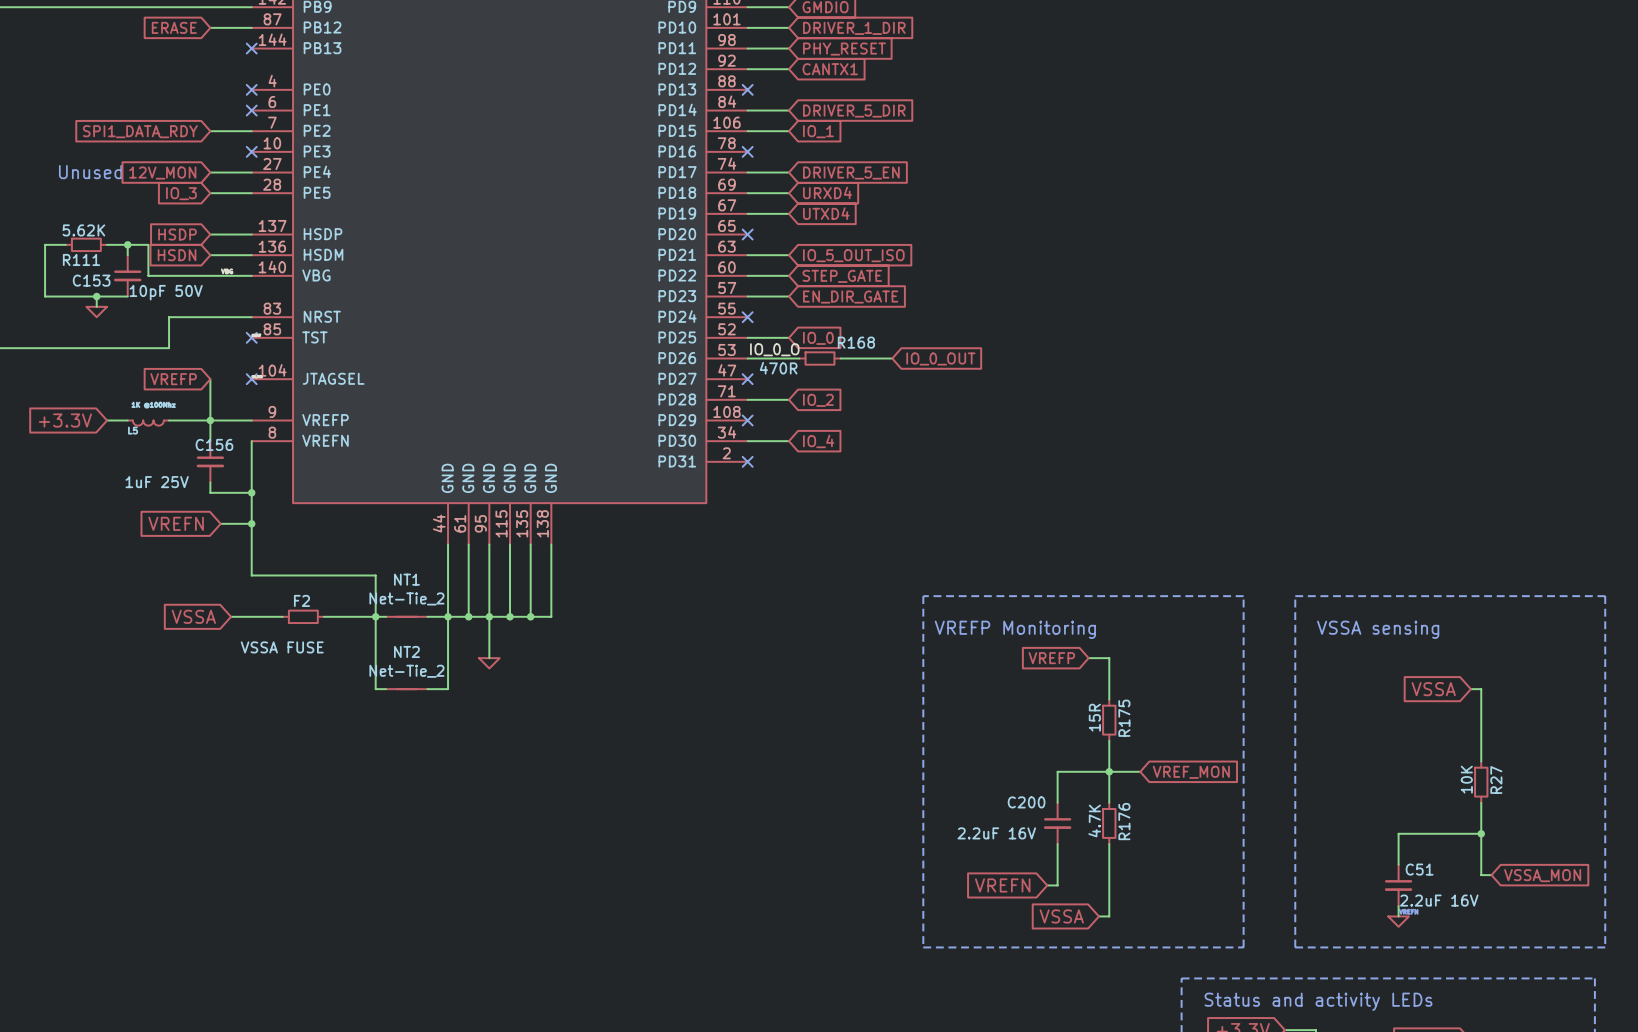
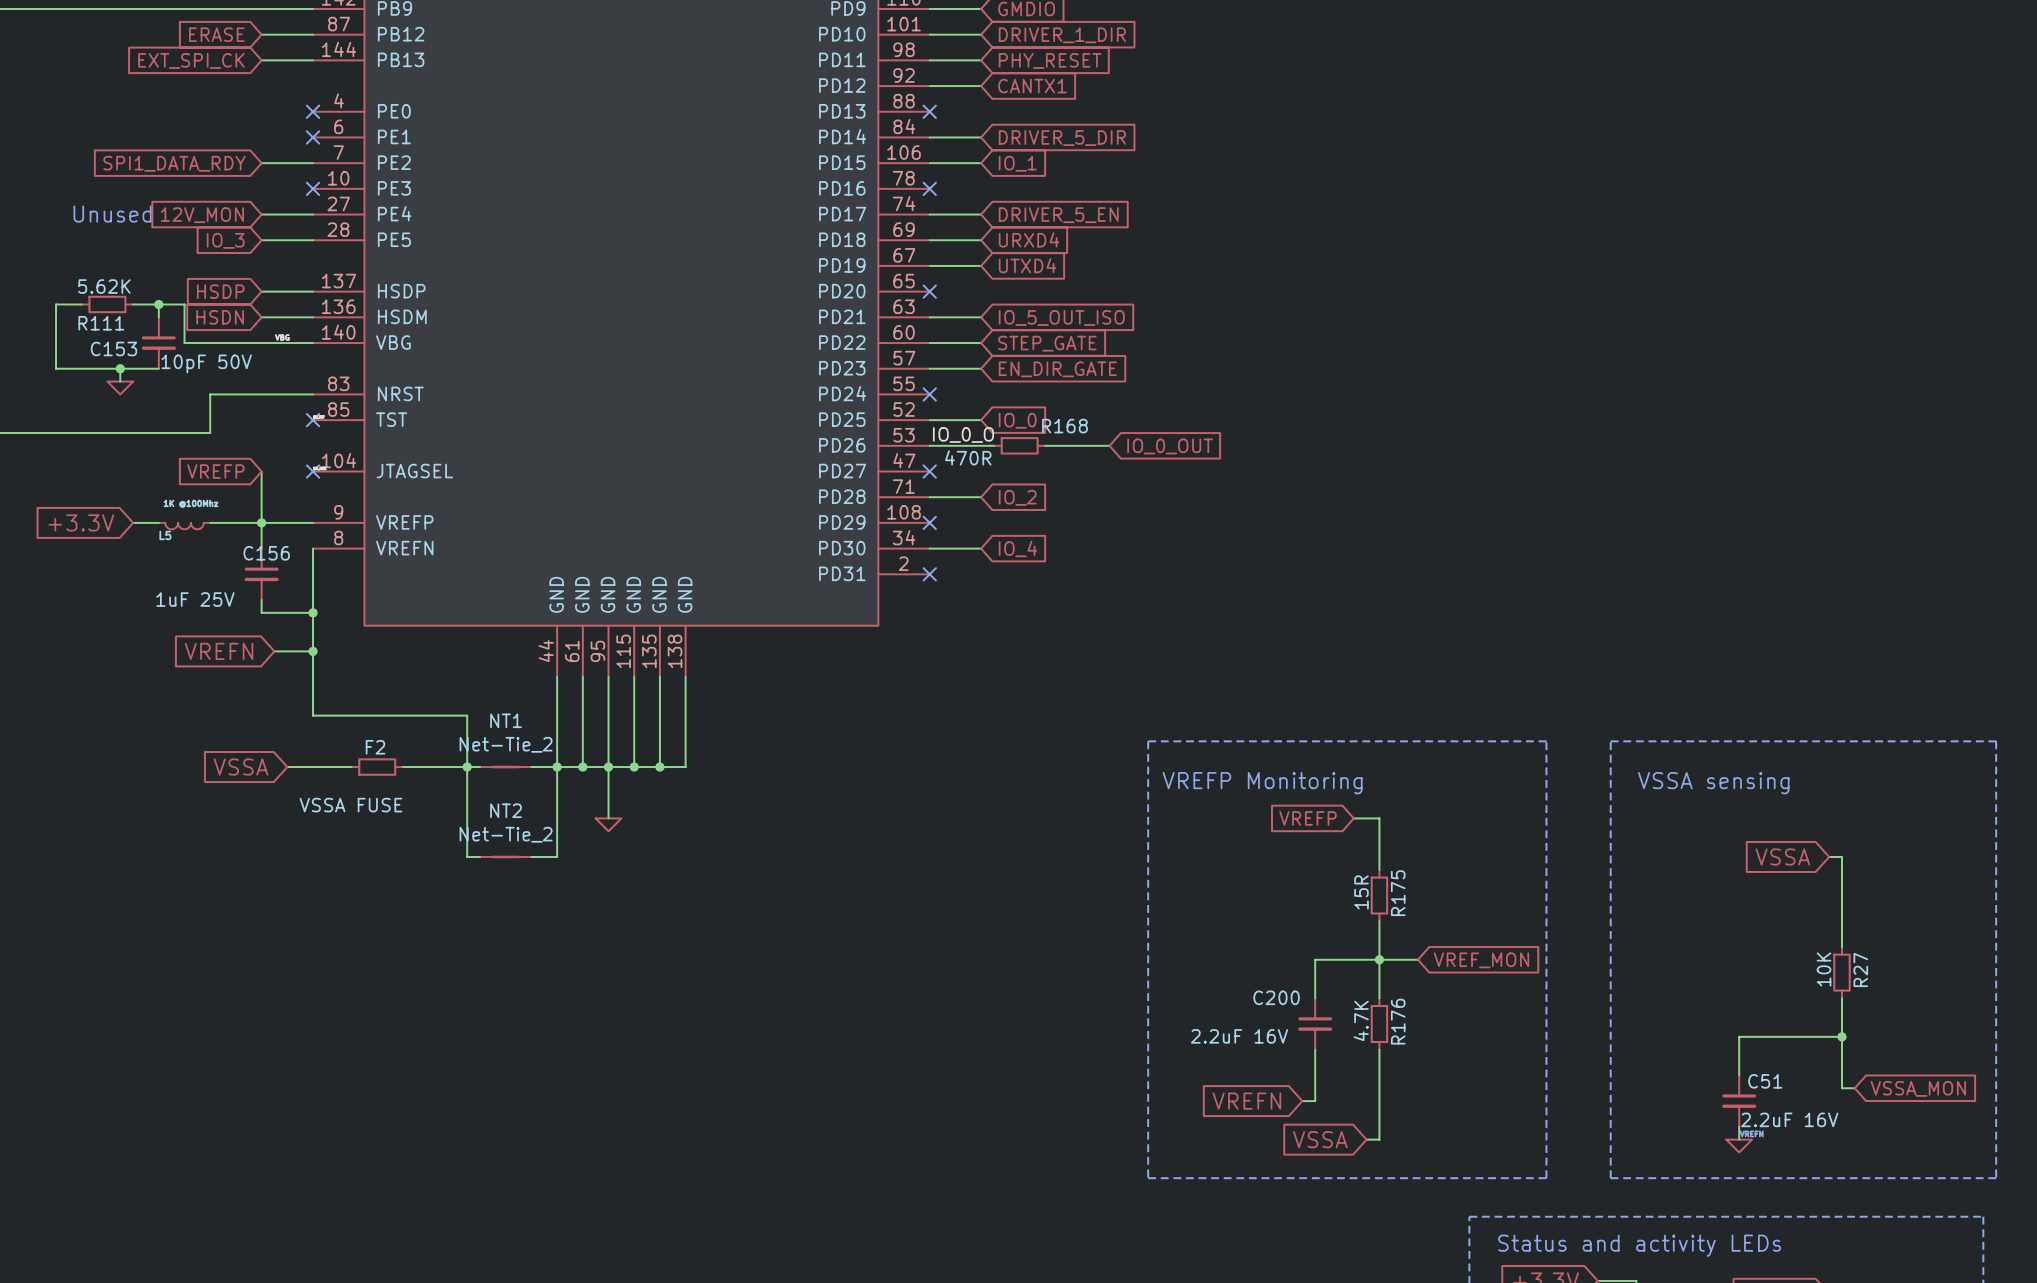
wire: none -> (261, 60) (313, 60)
no-connect mark: (251, 48) -> none
global label: none -> EXT_SPI_CK (191, 60)

